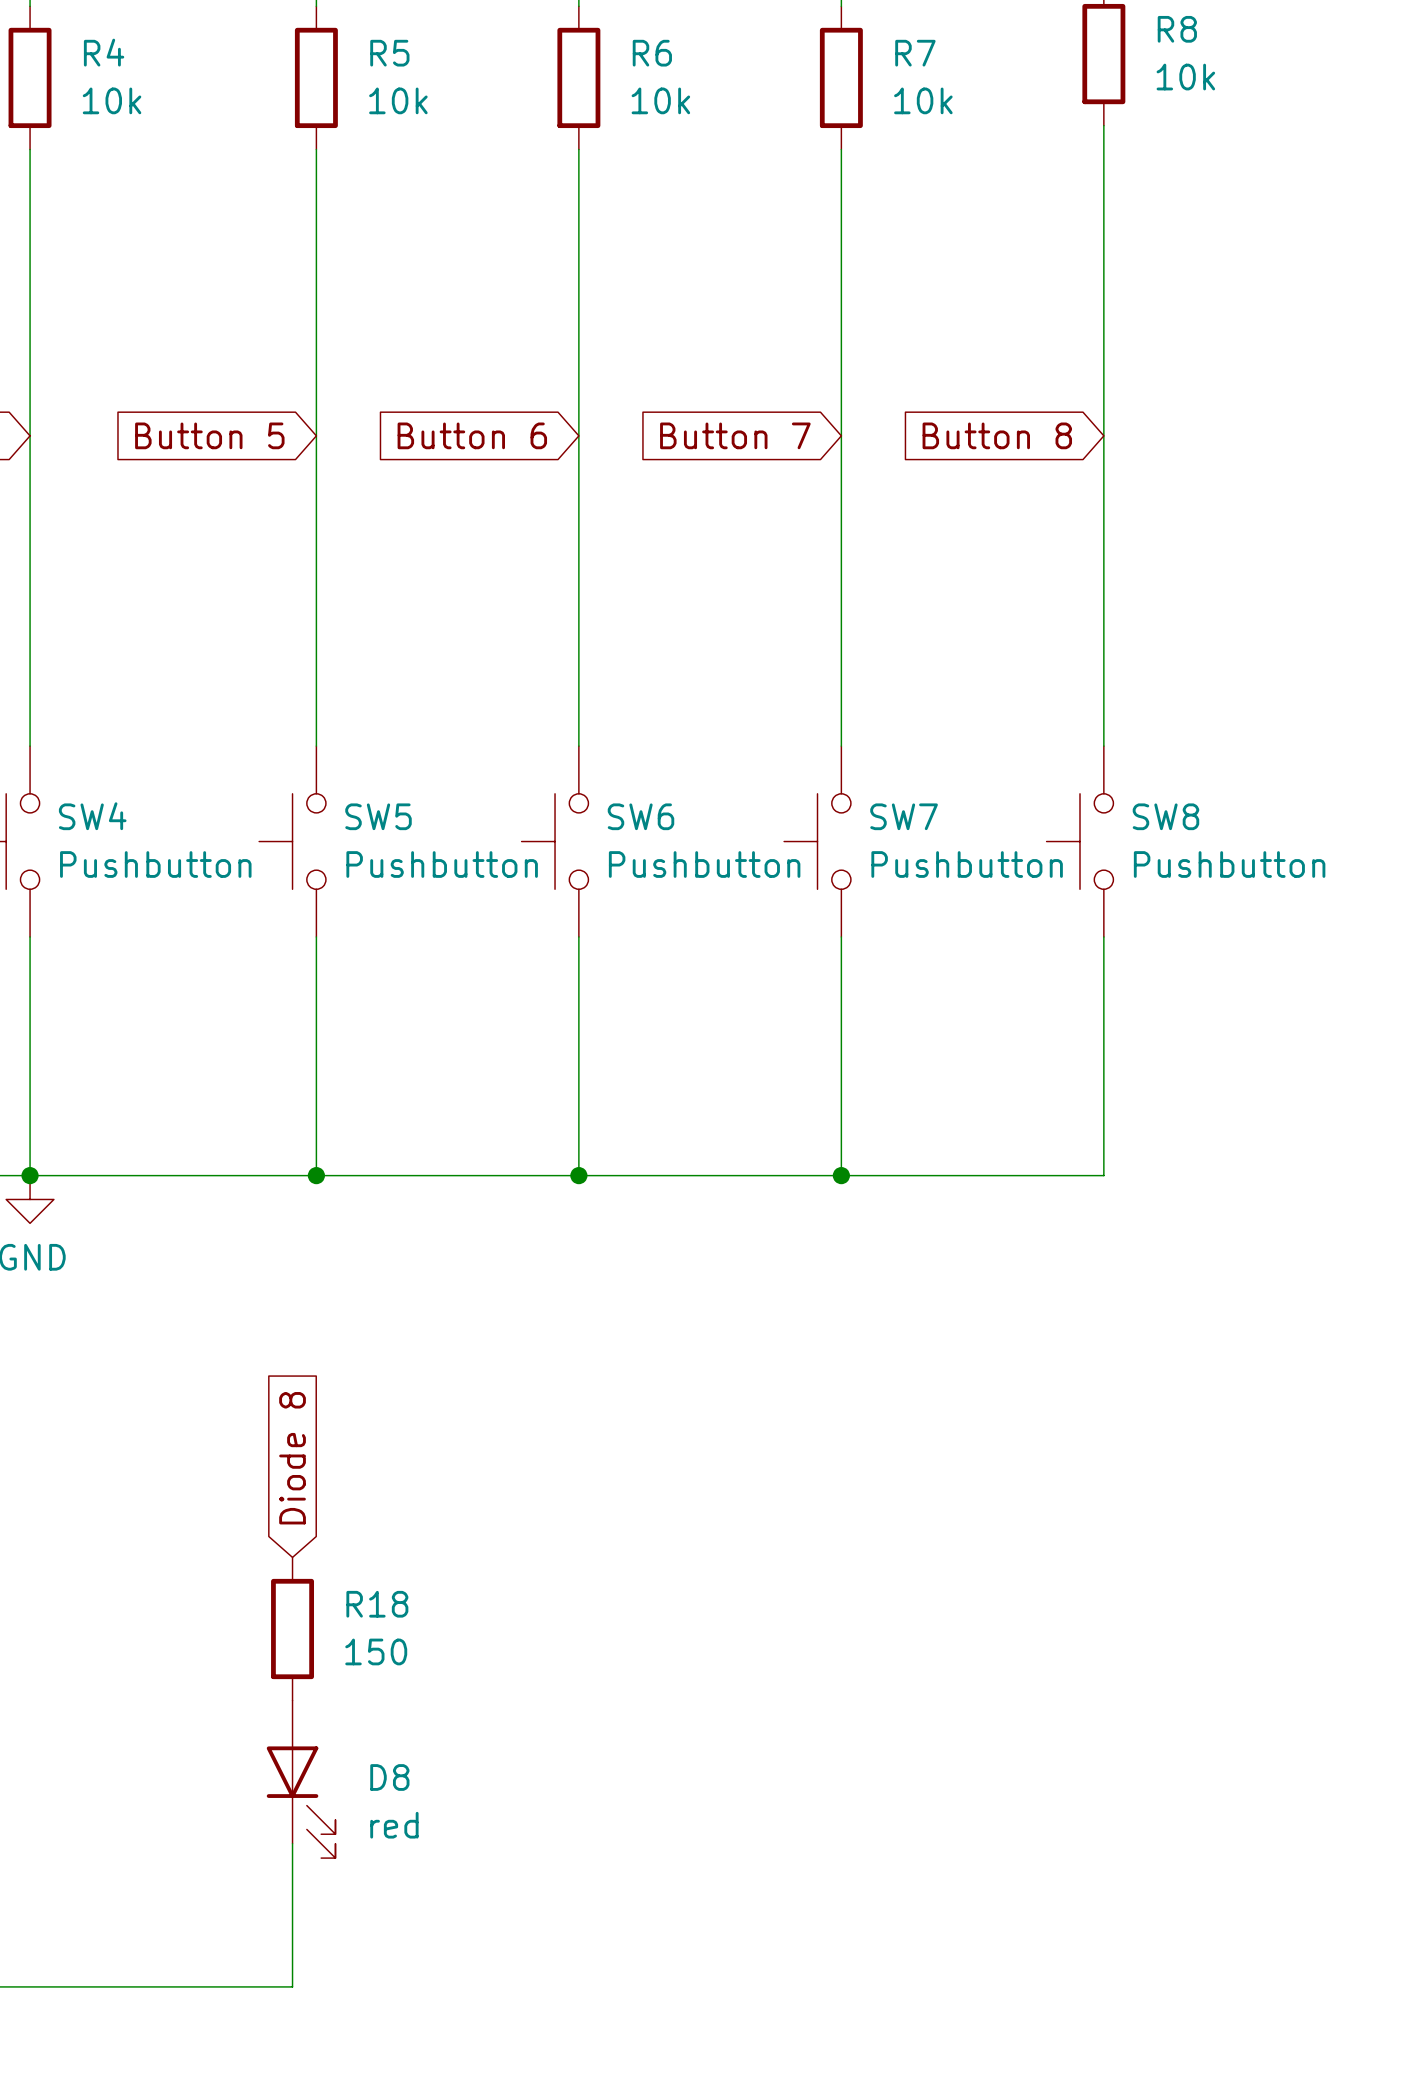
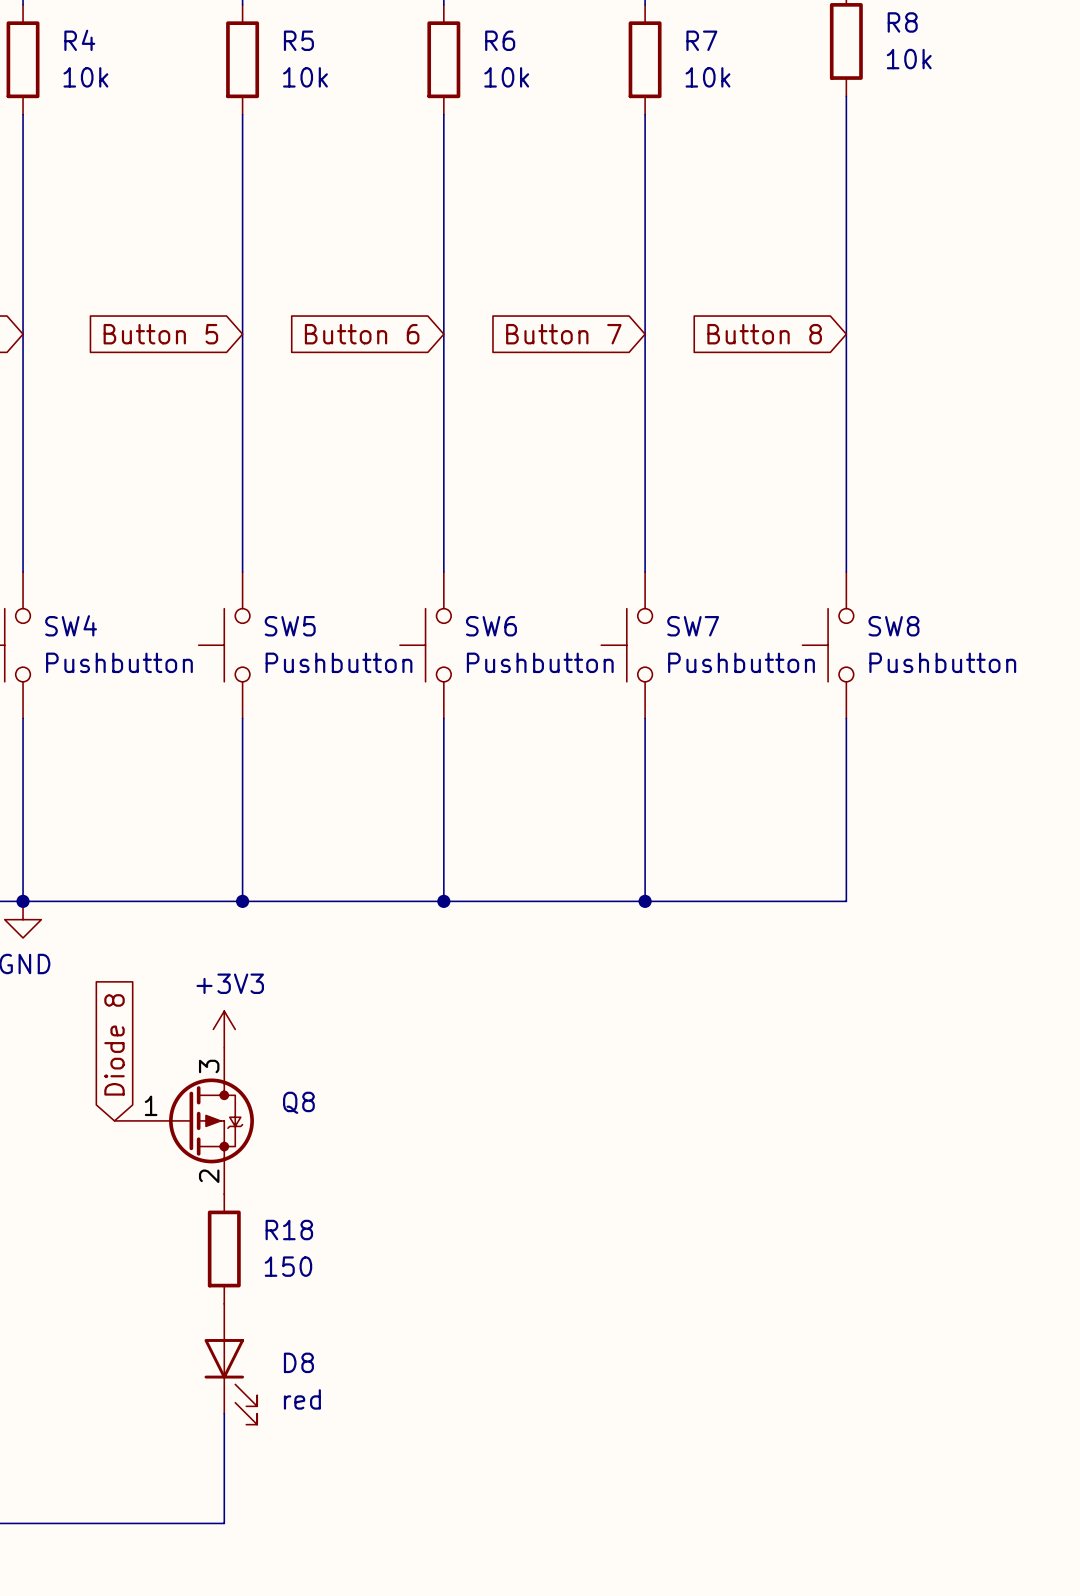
power symbol: none -> +3V3 (224, 1029)
global label position: Diode 8 (292, 1458) -> Diode 8 (114, 1044)
Q8: none -> (184, 1120)

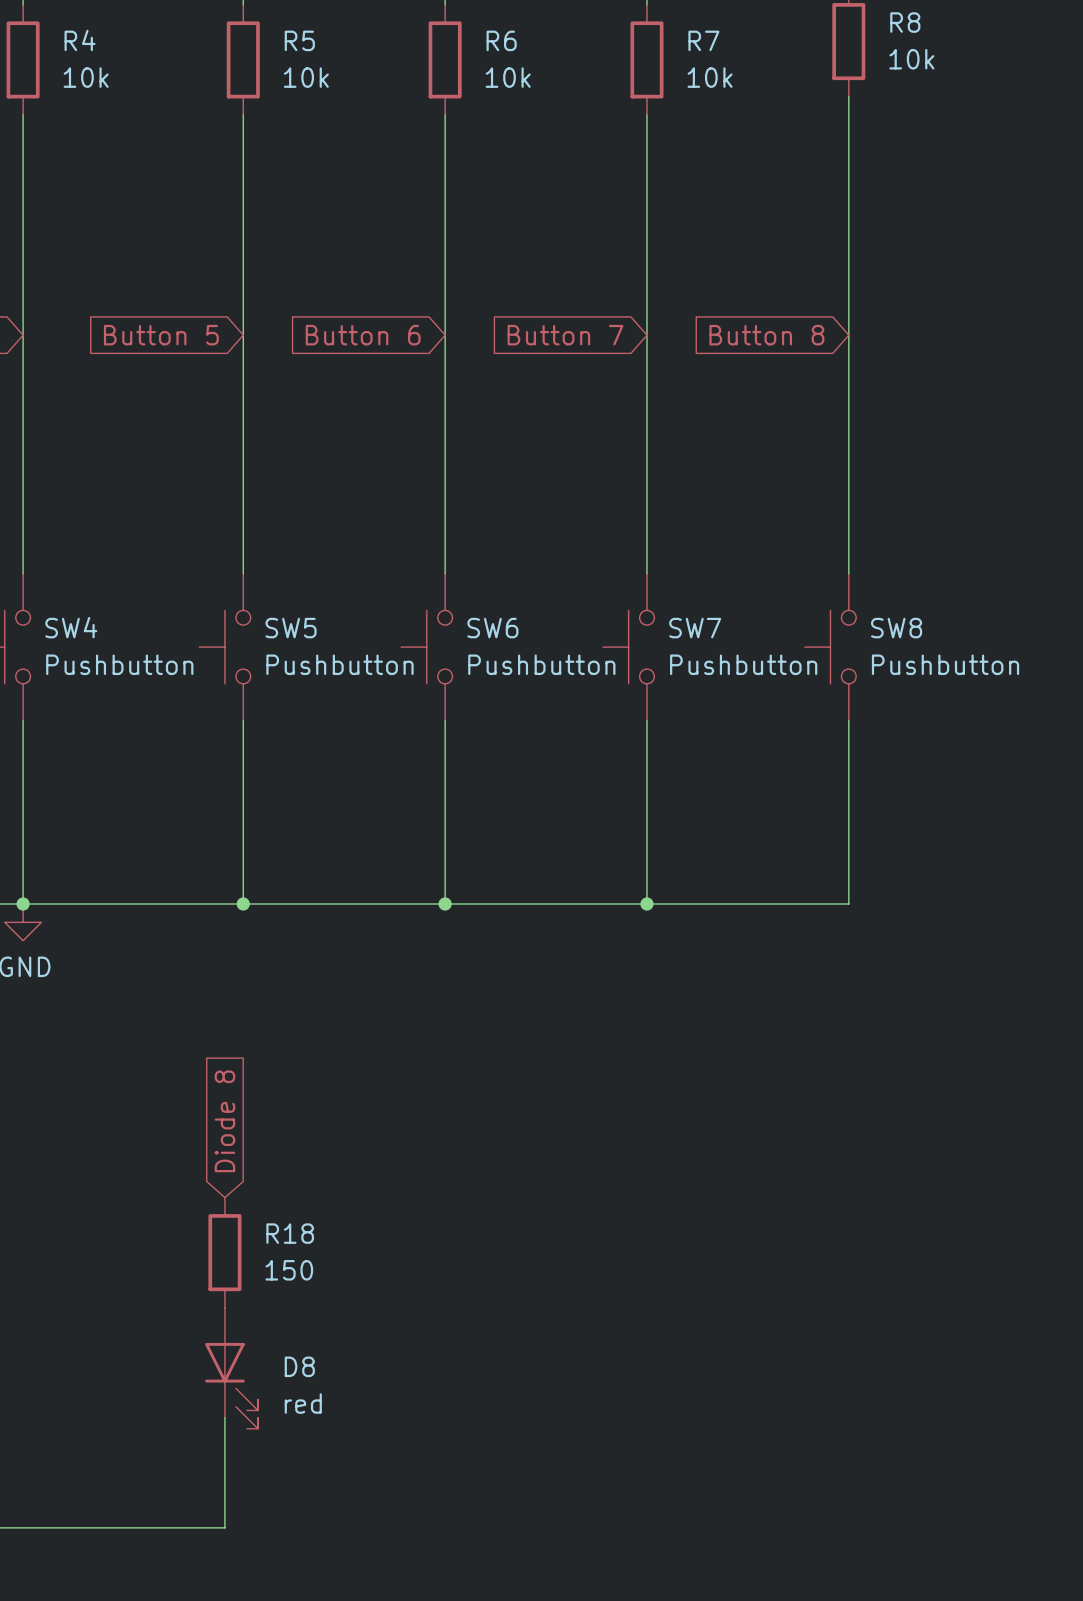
power symbol: +3V3 (224, 1029) -> none
global label position: Diode 8 (114, 1044) -> Diode 8 (224, 1121)
Q8: (184, 1120) -> none

